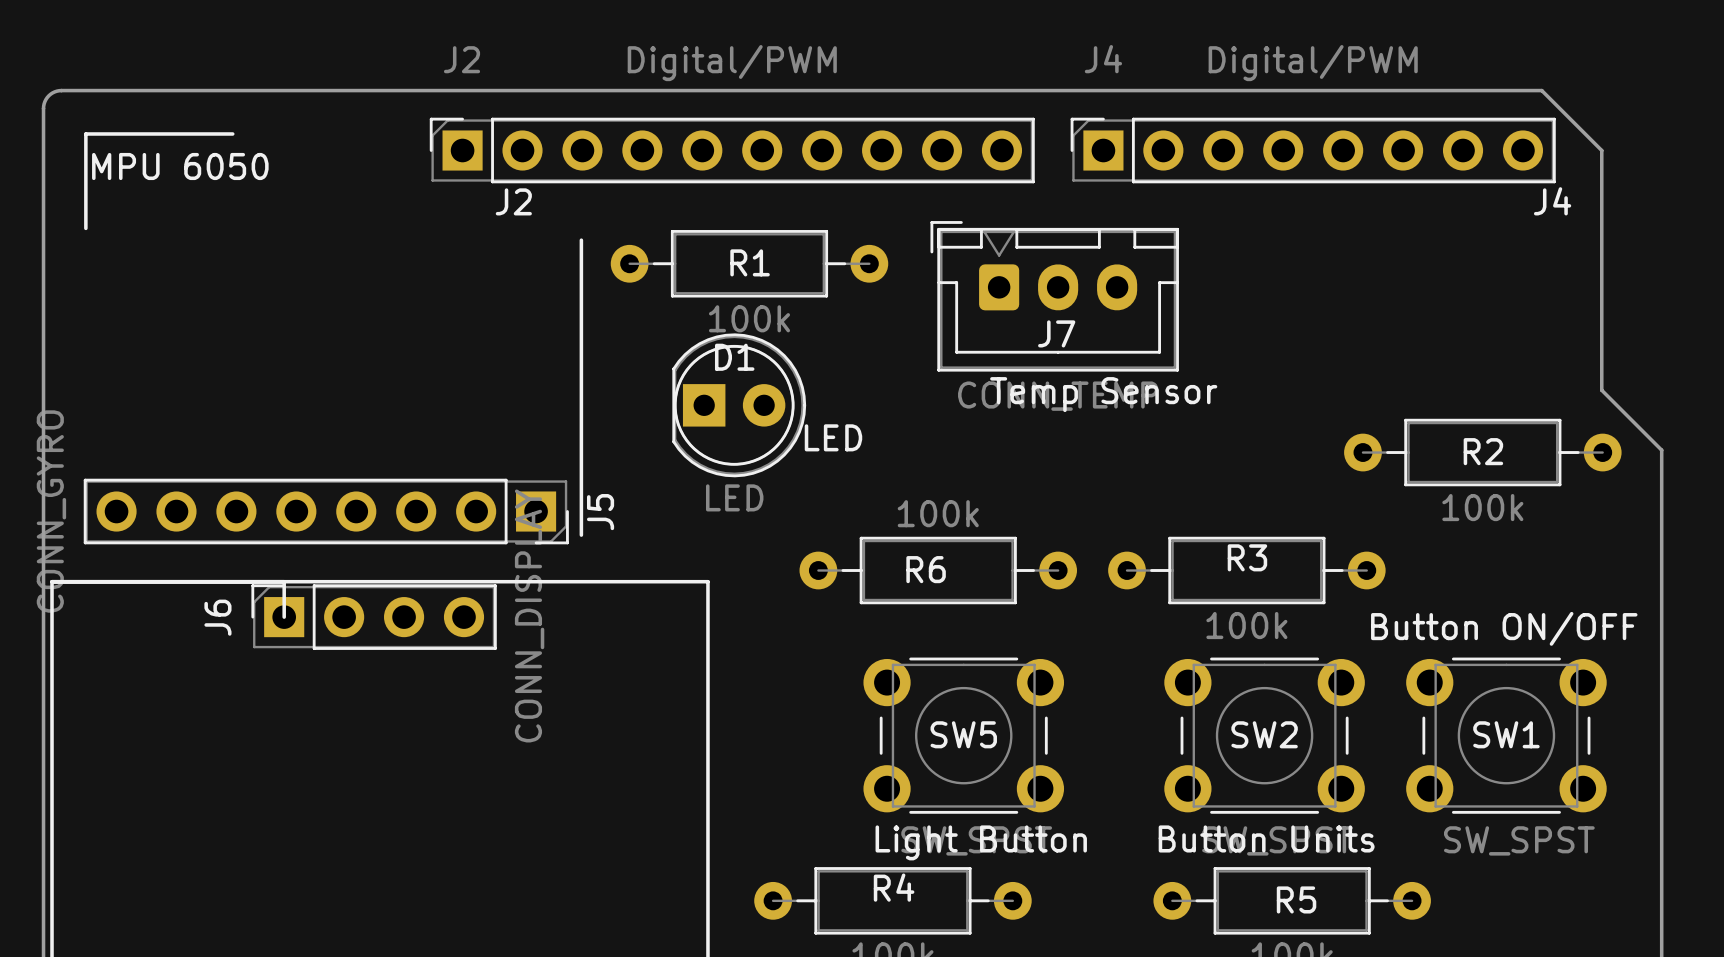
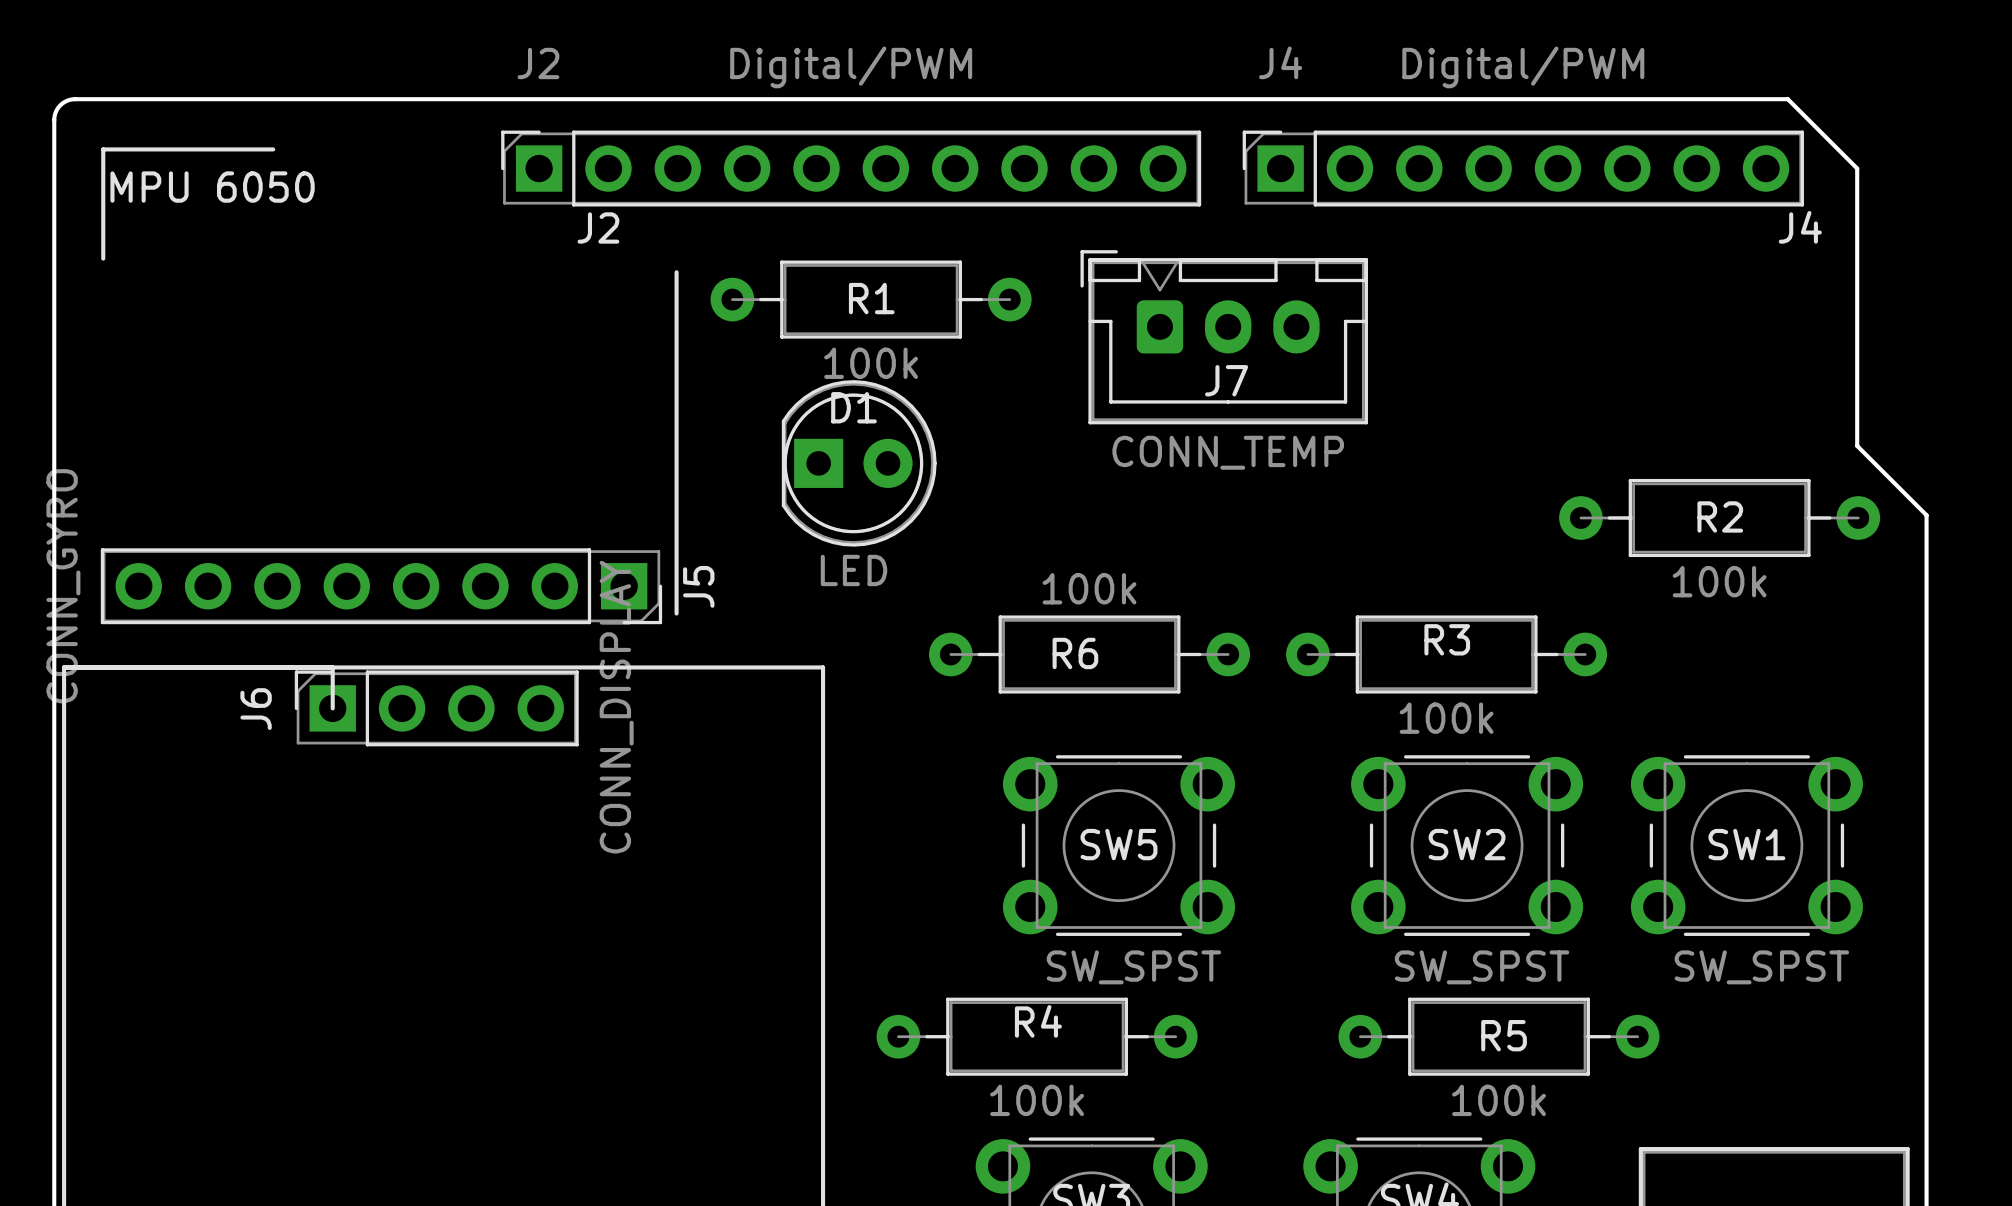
text: Temp Sensor (1103, 394) -> none
text: LED (833, 437) -> none
text: Button ON/OFF (1504, 628) -> none
text: Button Units (1266, 838) -> none
text: Light Button (981, 842) -> none

